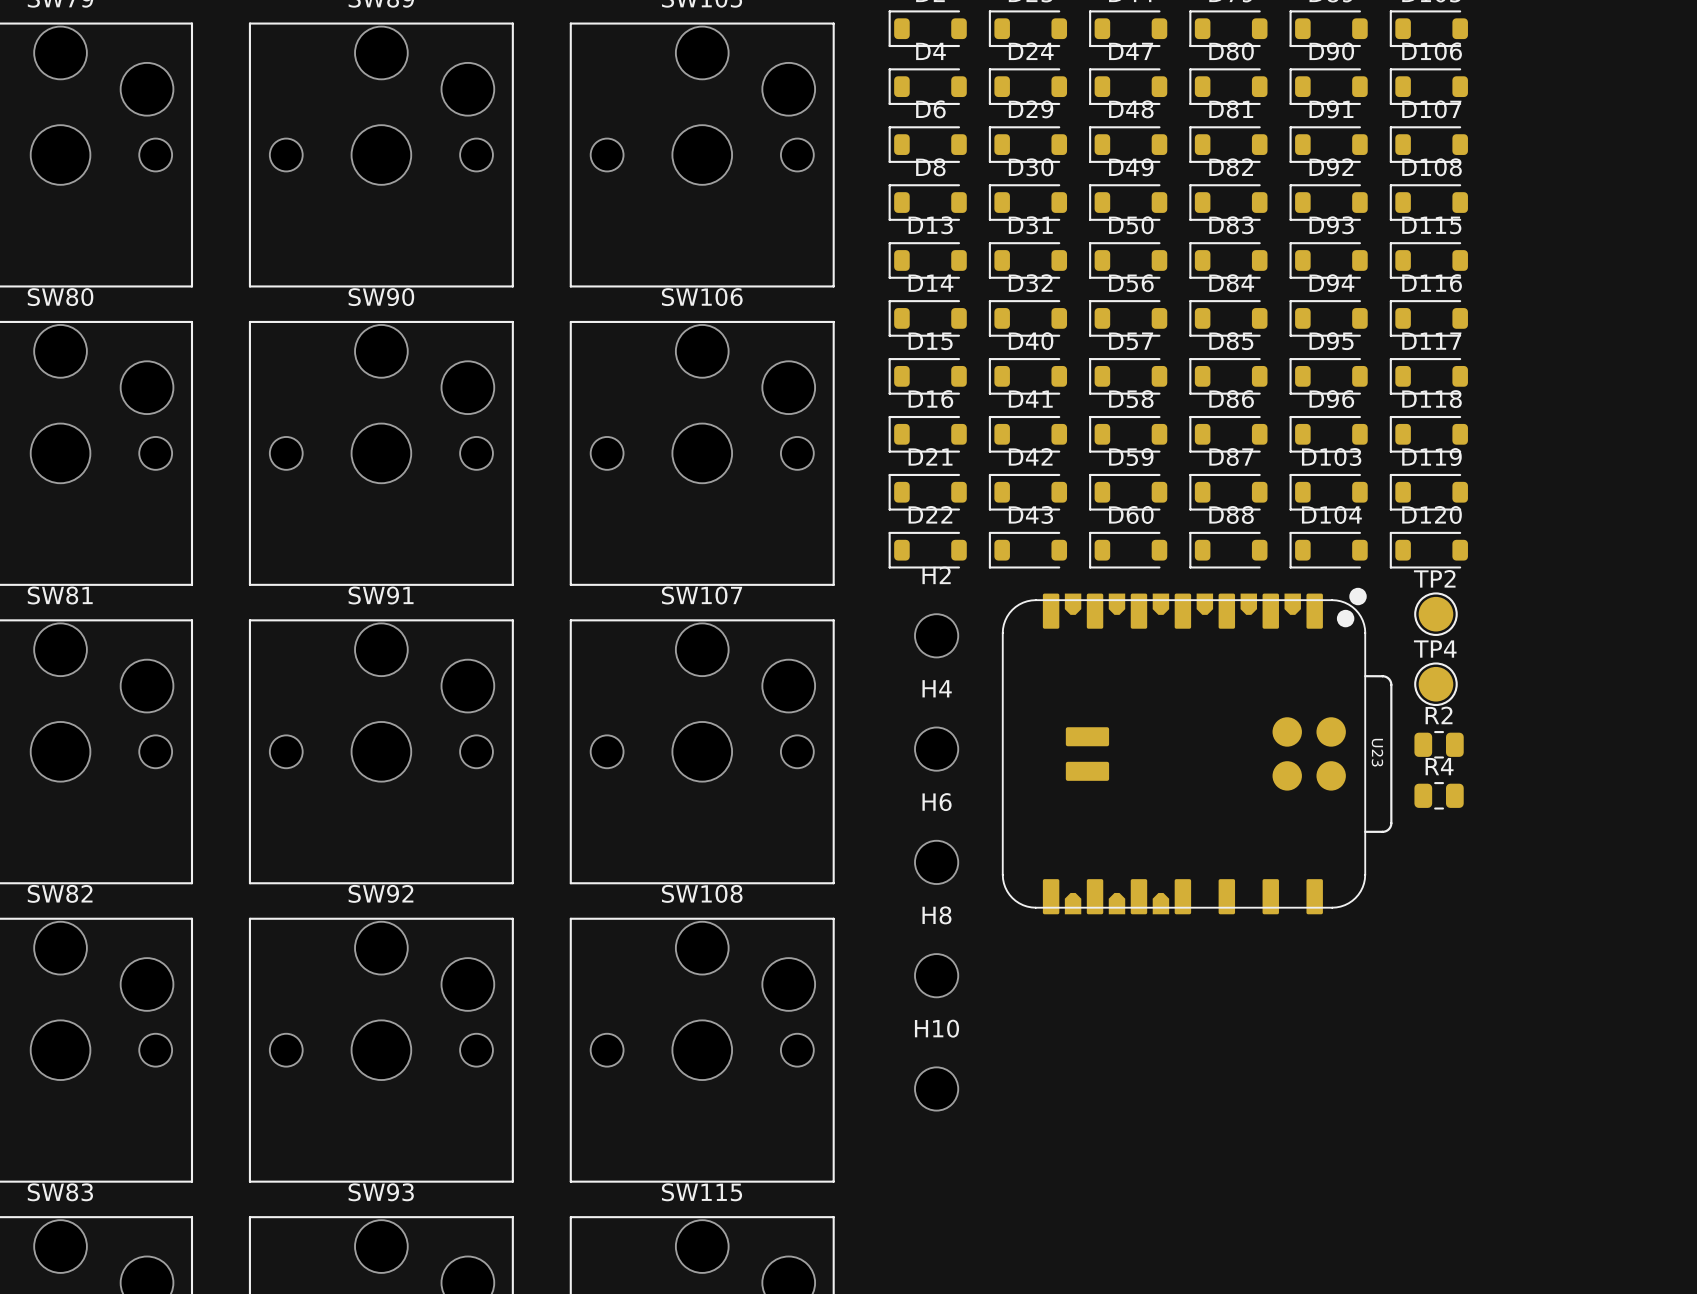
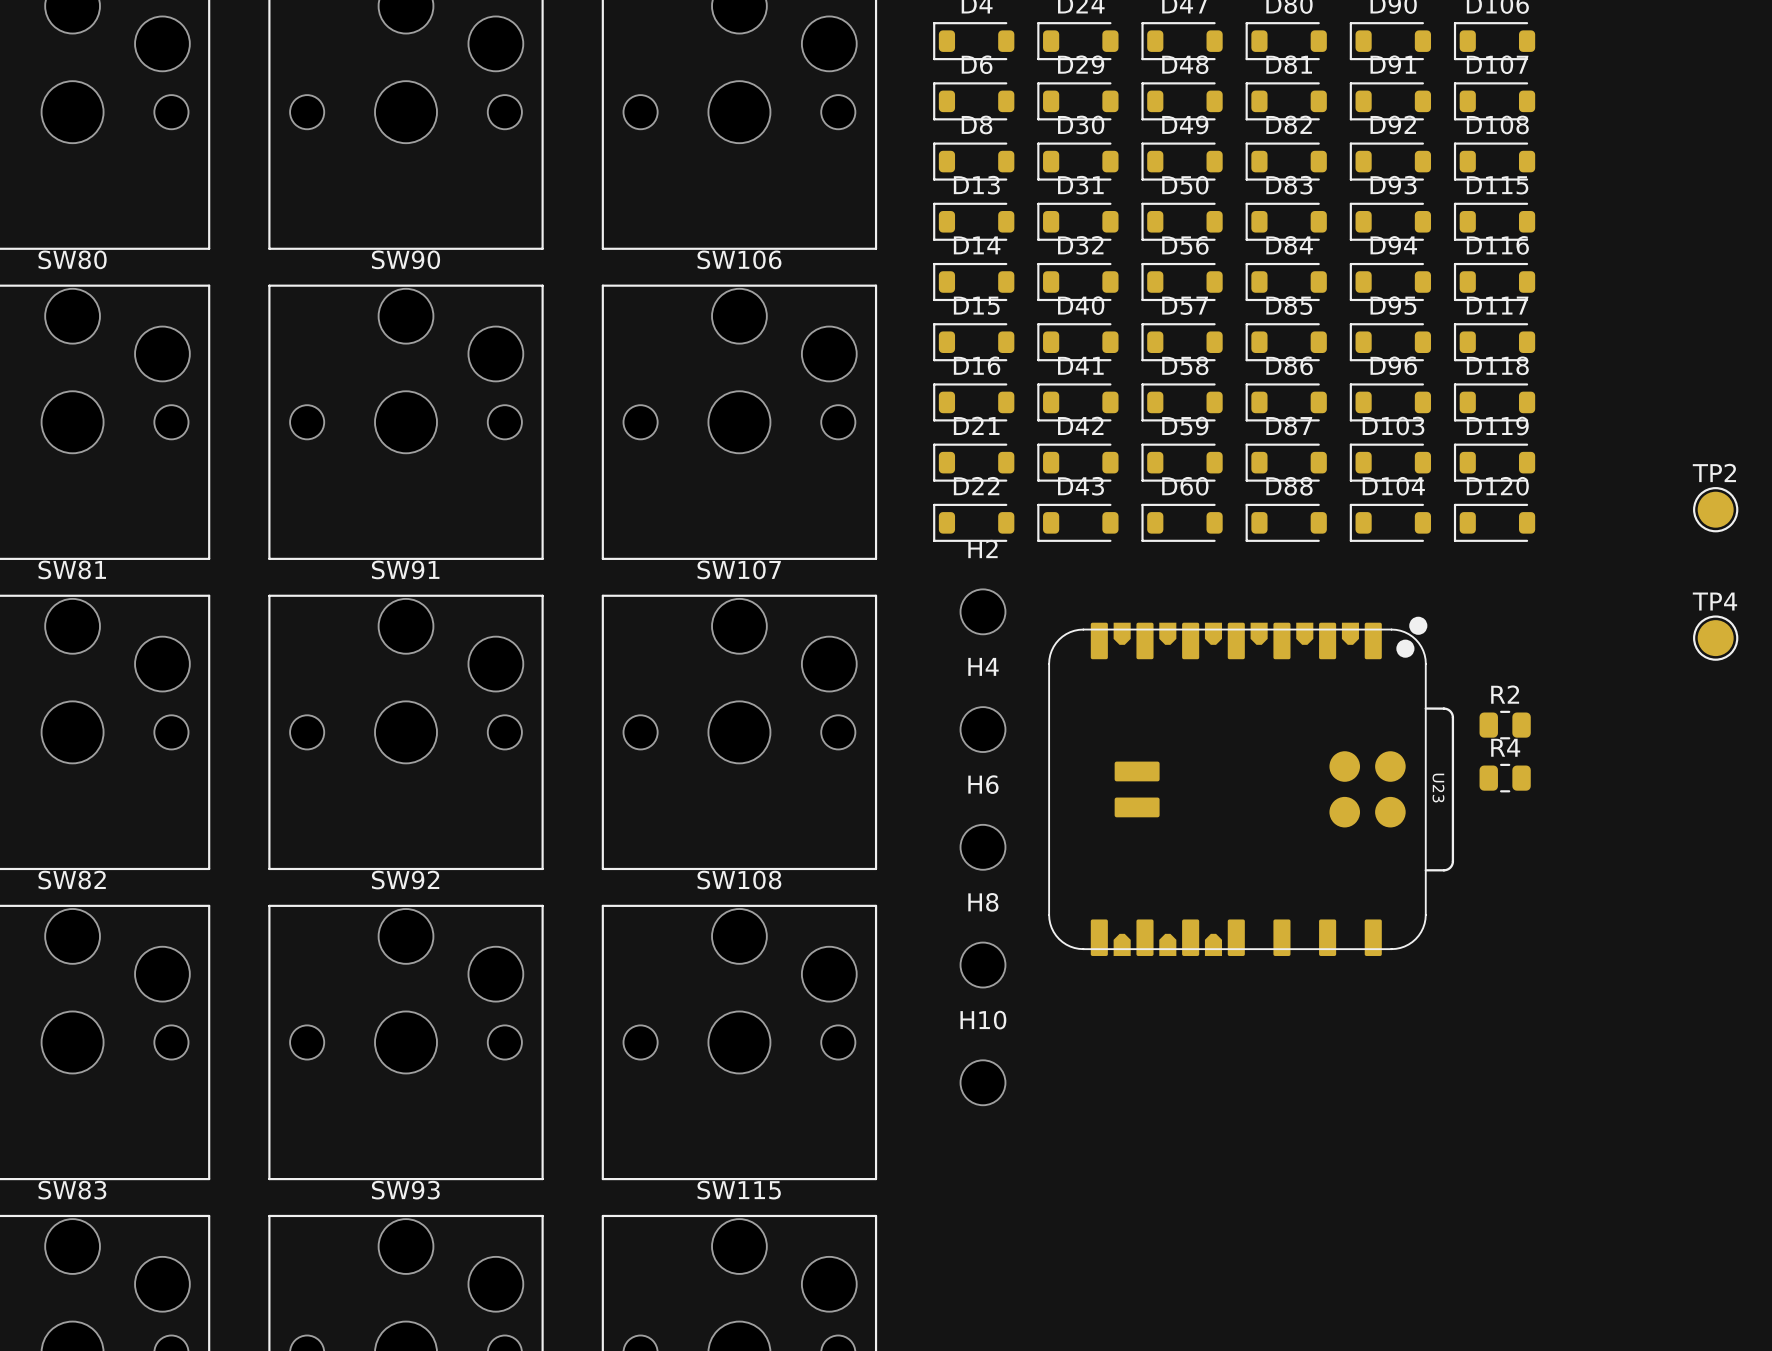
TP2 position: (1435, 614) -> (1715, 509)
TP4 position: (1435, 684) -> (1715, 638)
U23 position: (1197, 751) -> (1251, 786)

